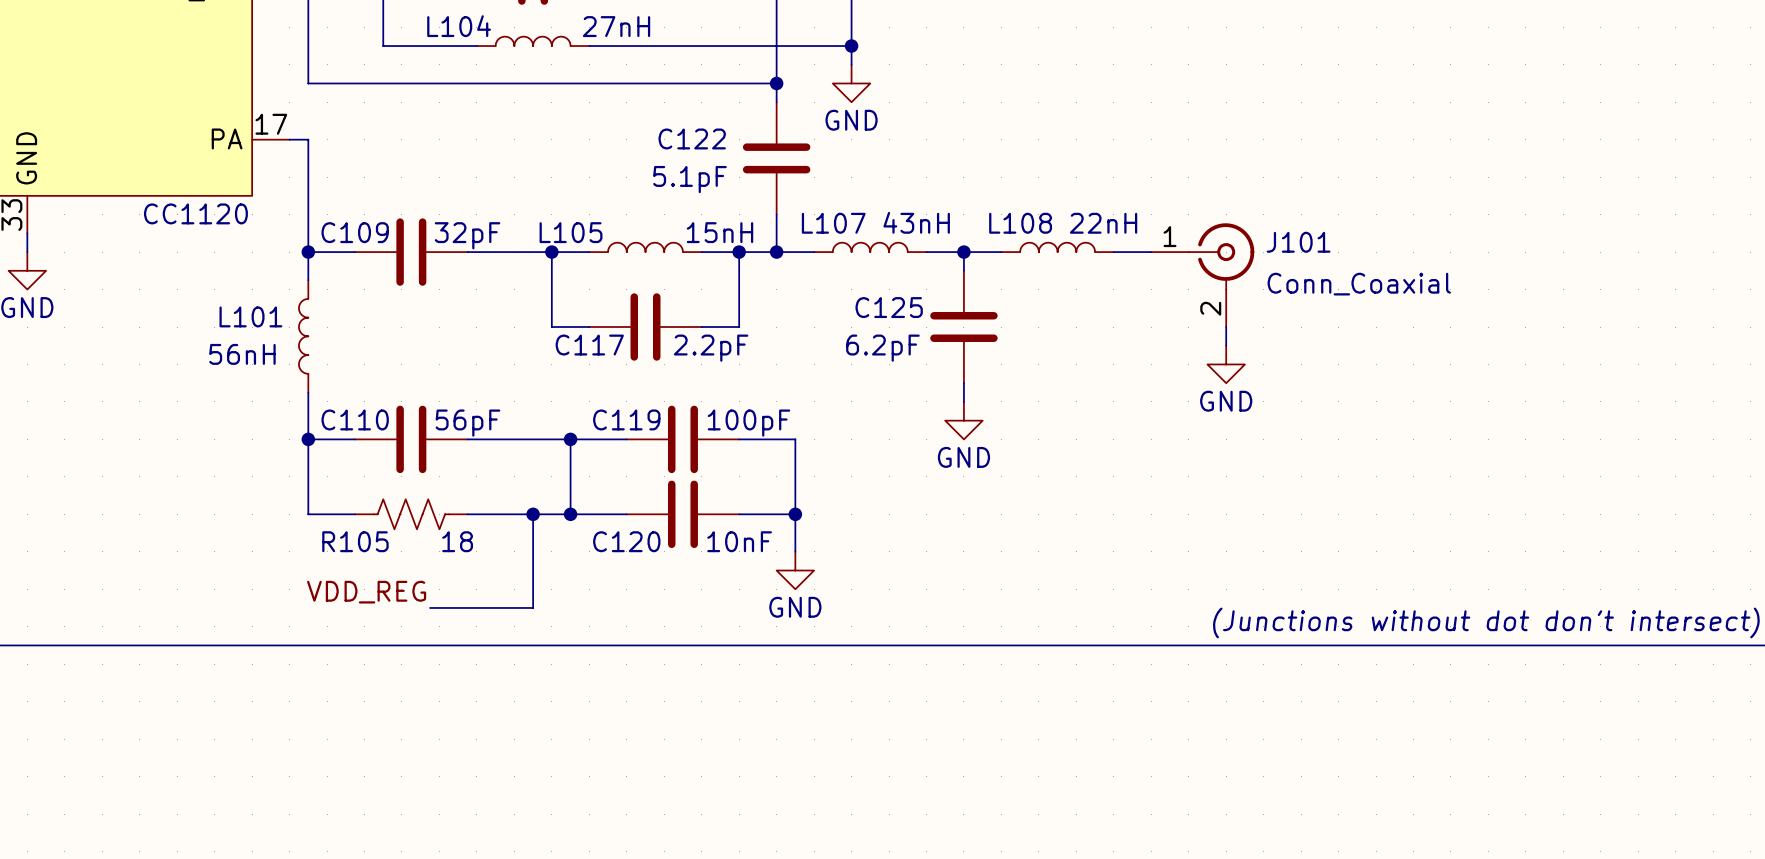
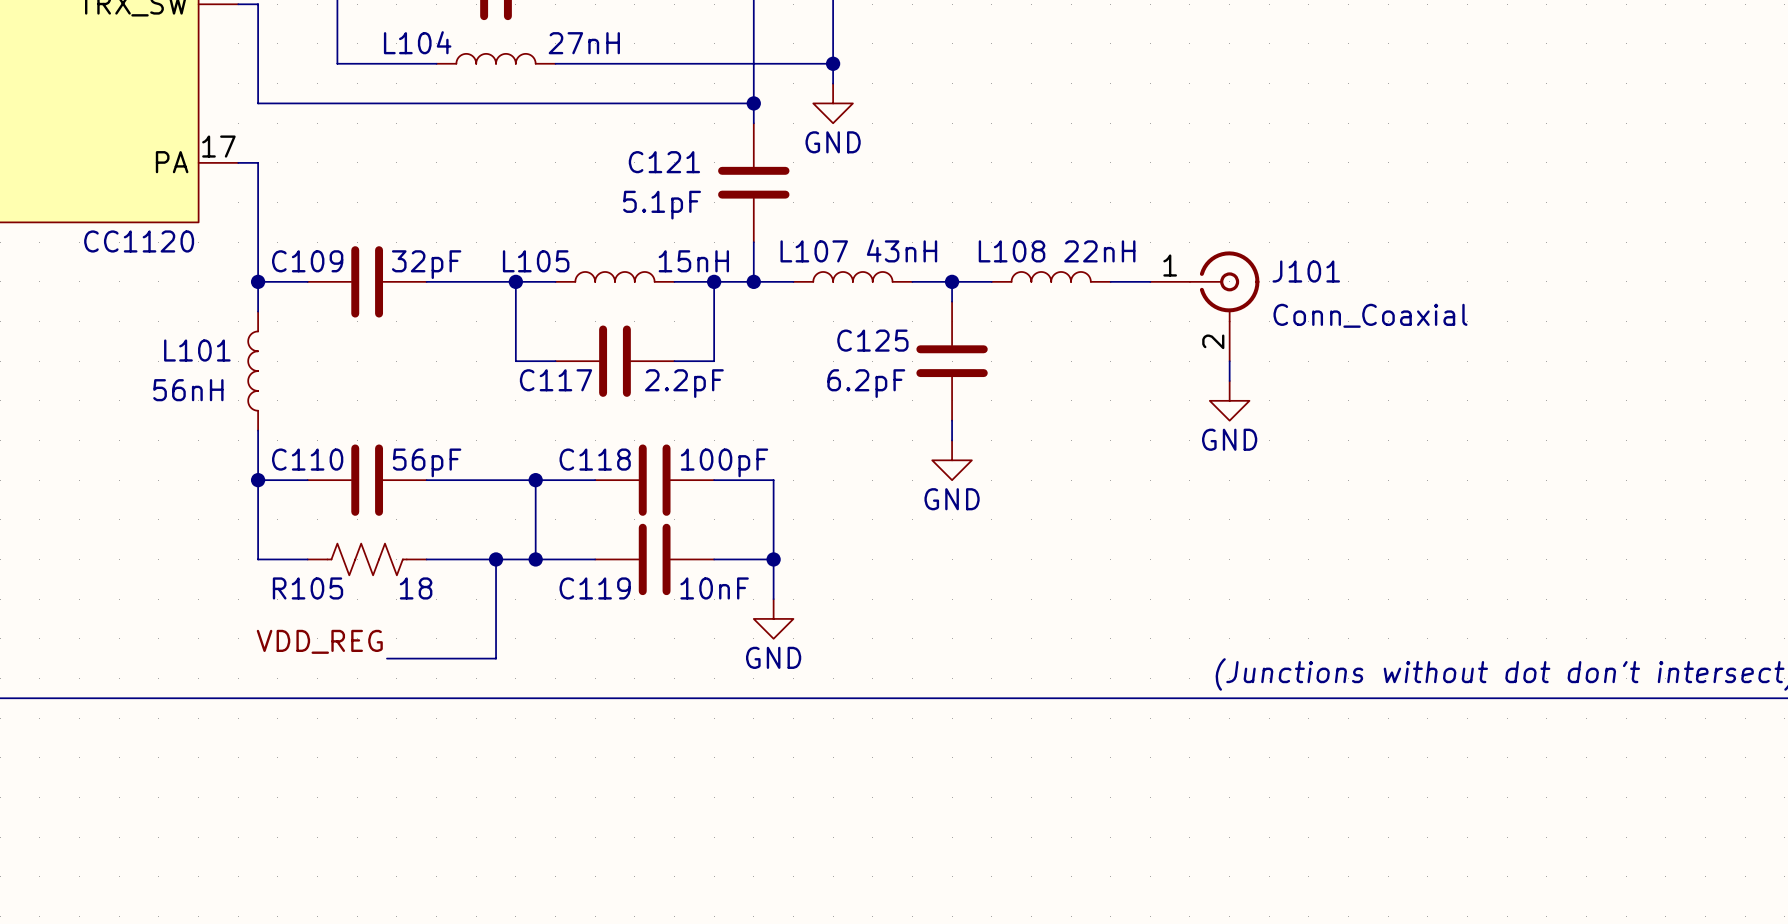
C122 name: C122 (692, 138) -> C121 (664, 162)
C119 name: C119 (626, 419) -> C118 (595, 459)
C120 name: C120 (626, 541) -> C119 (595, 588)

